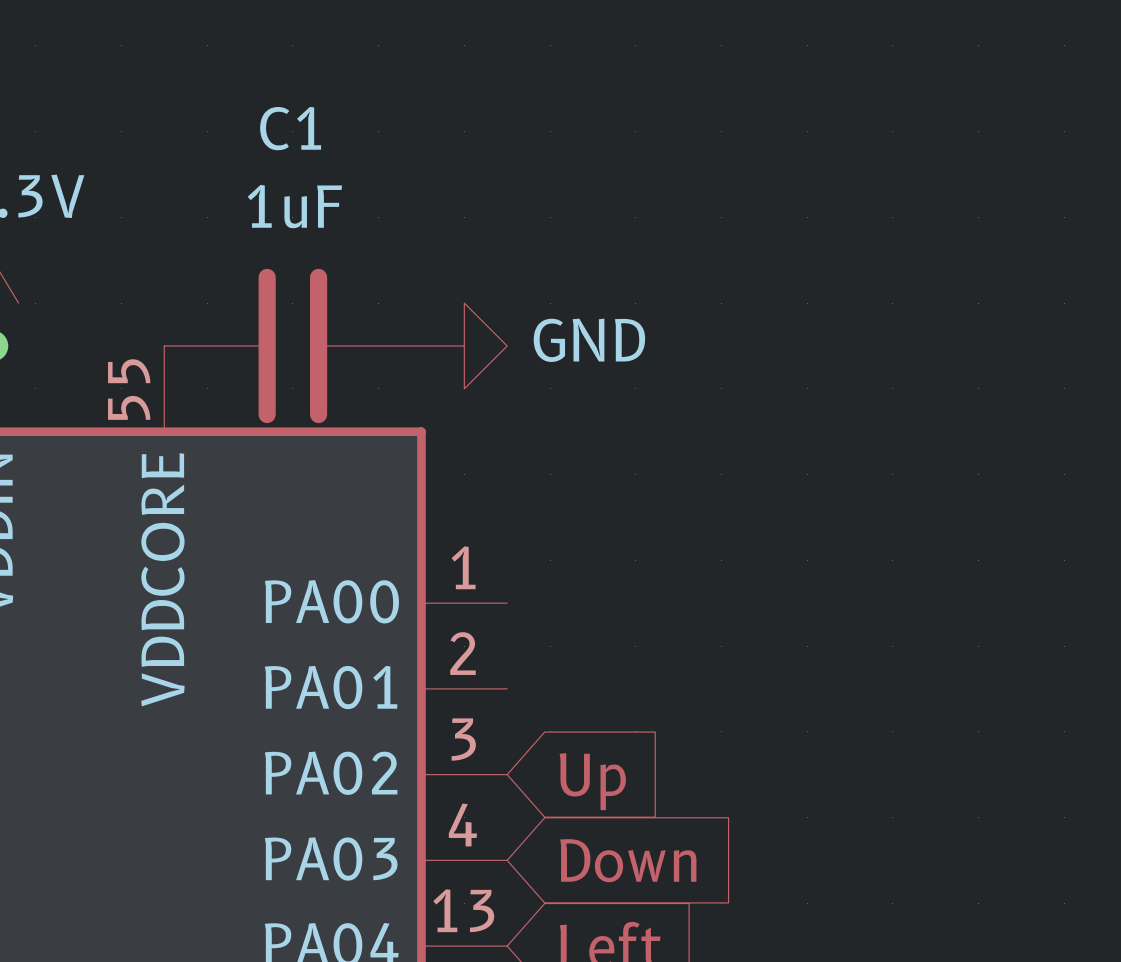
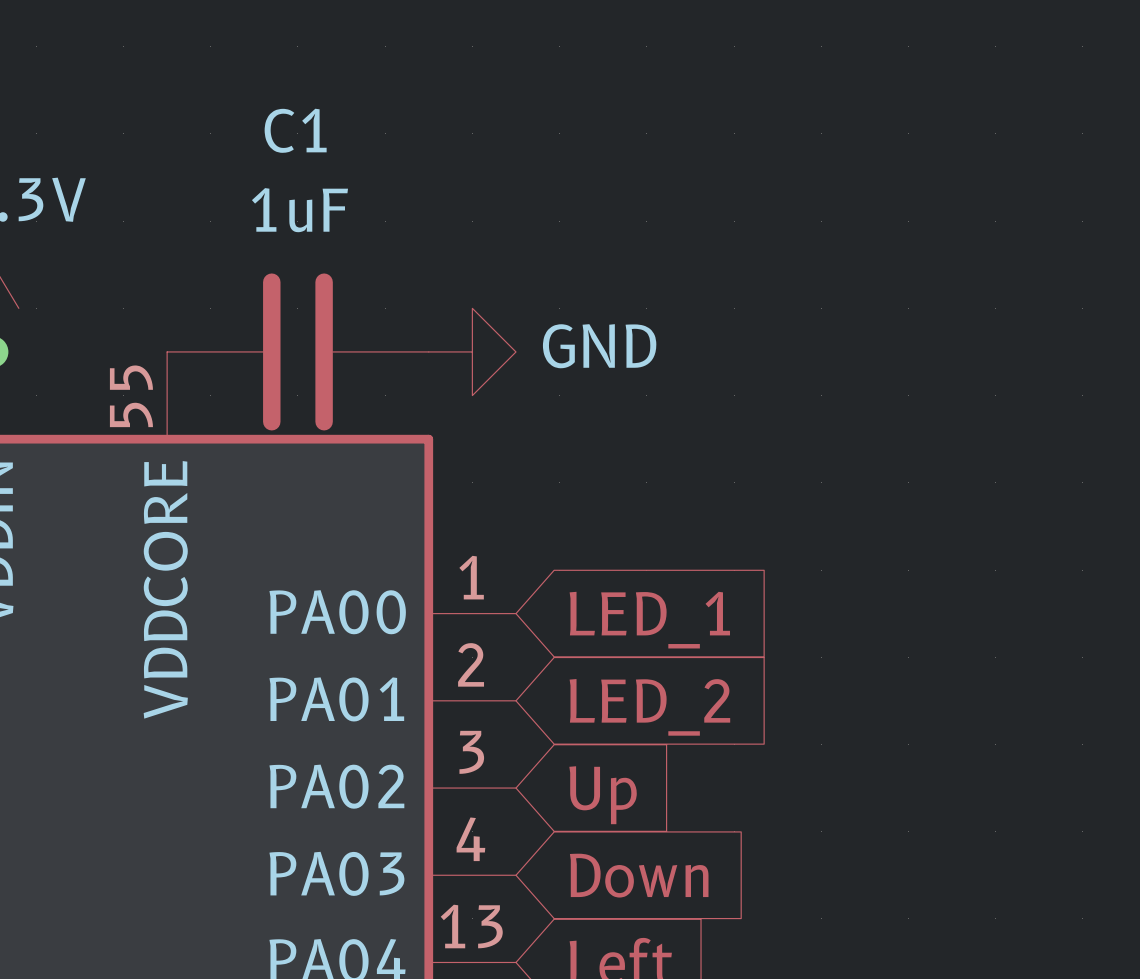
global label: none -> LED_1 (649, 620)
global label: none -> LED_2 (649, 707)

